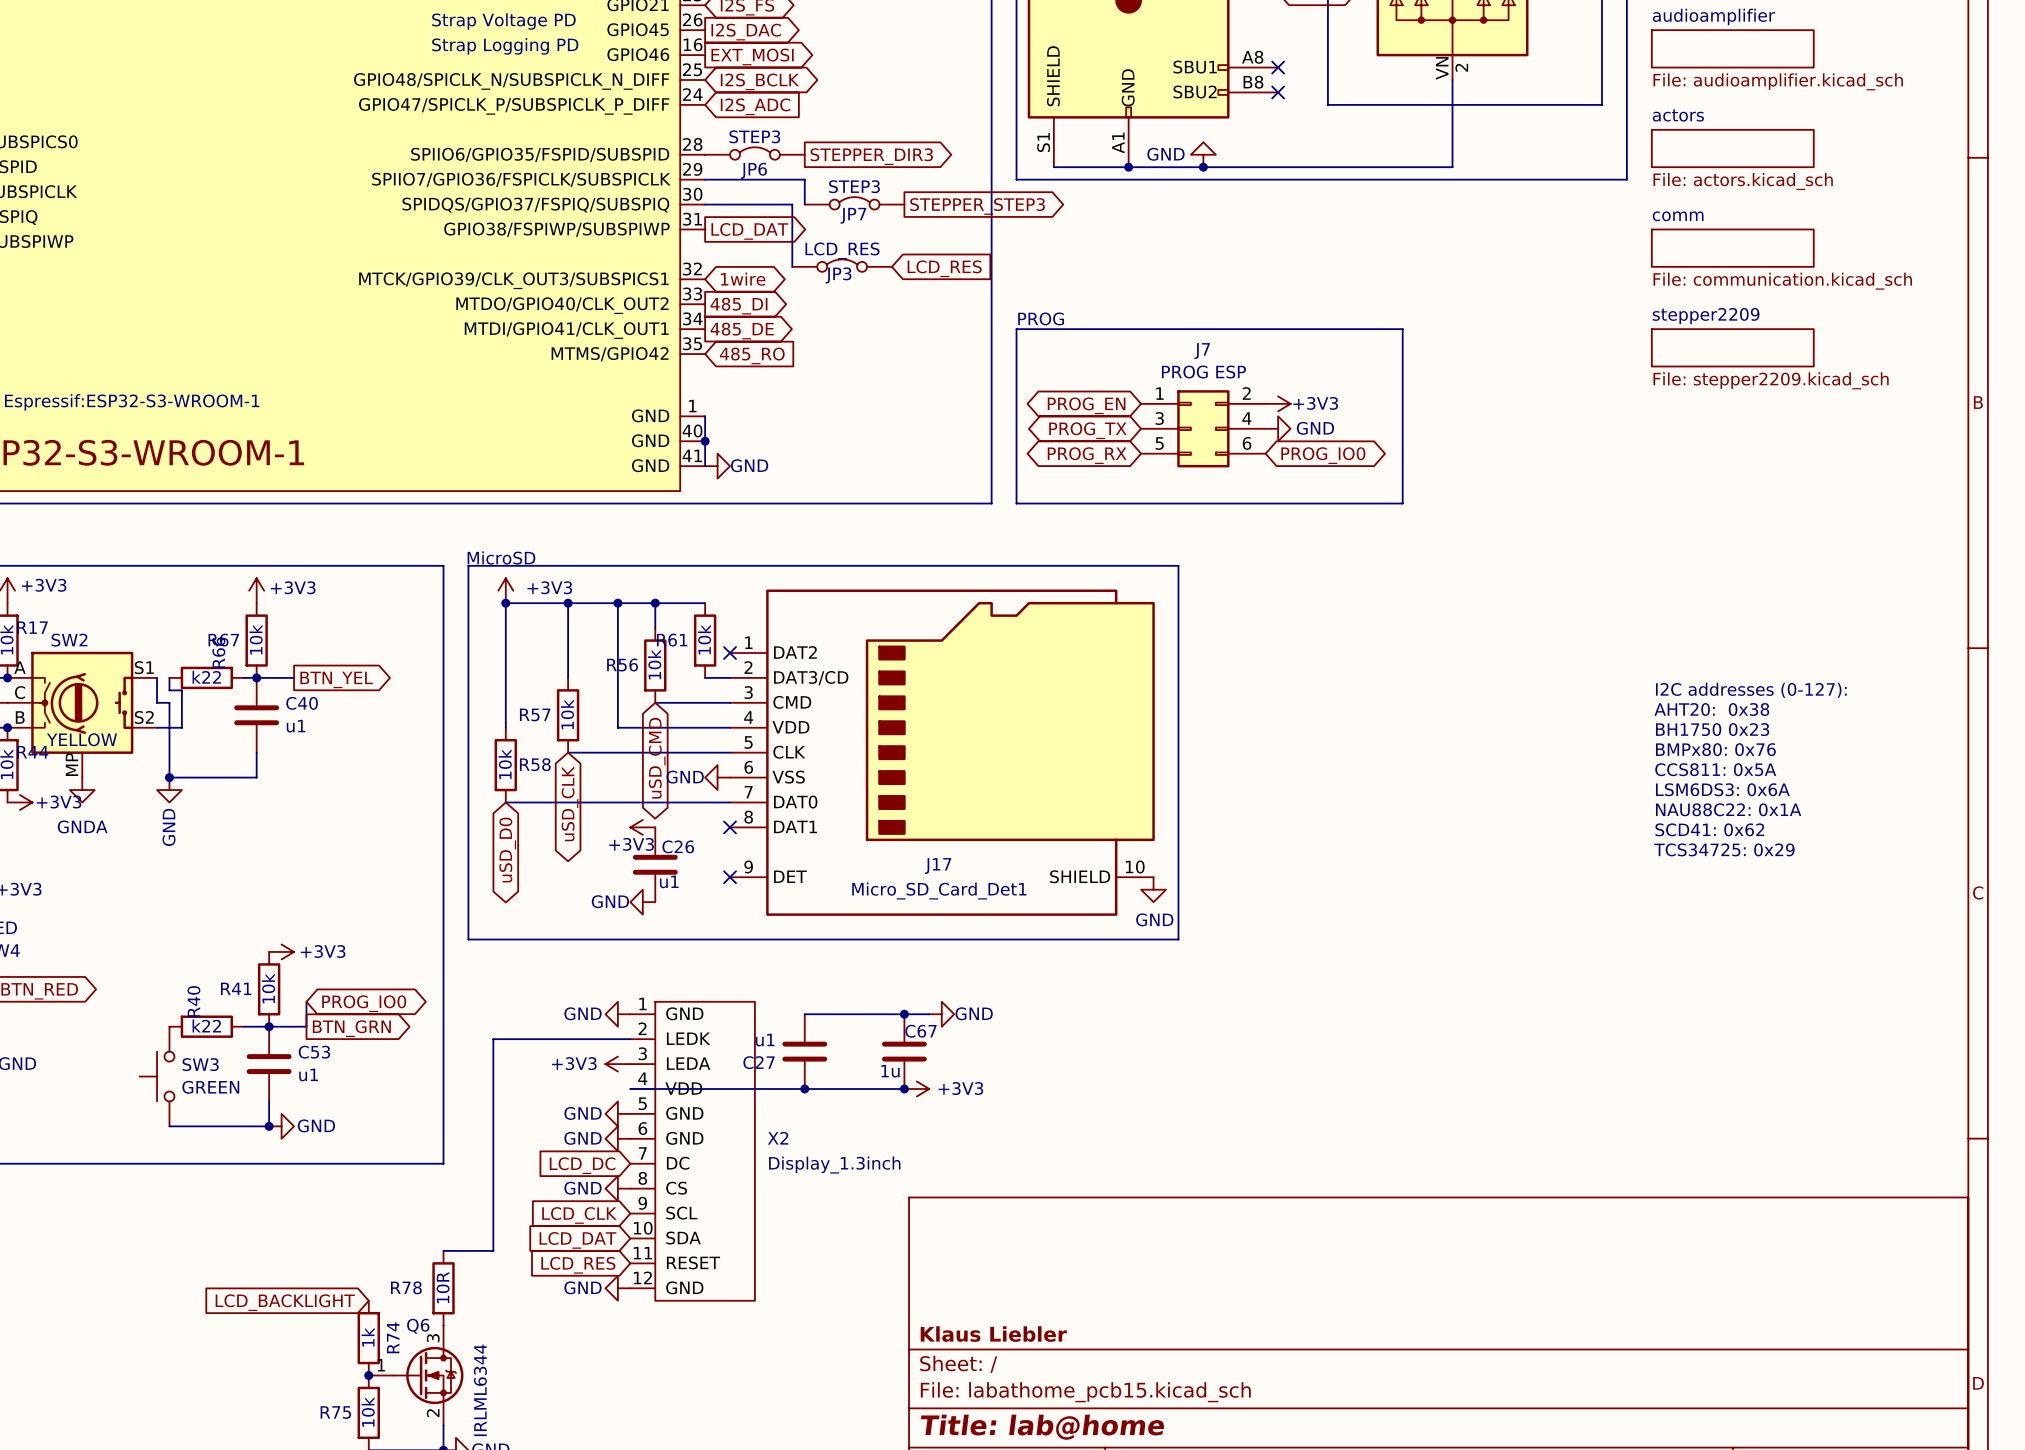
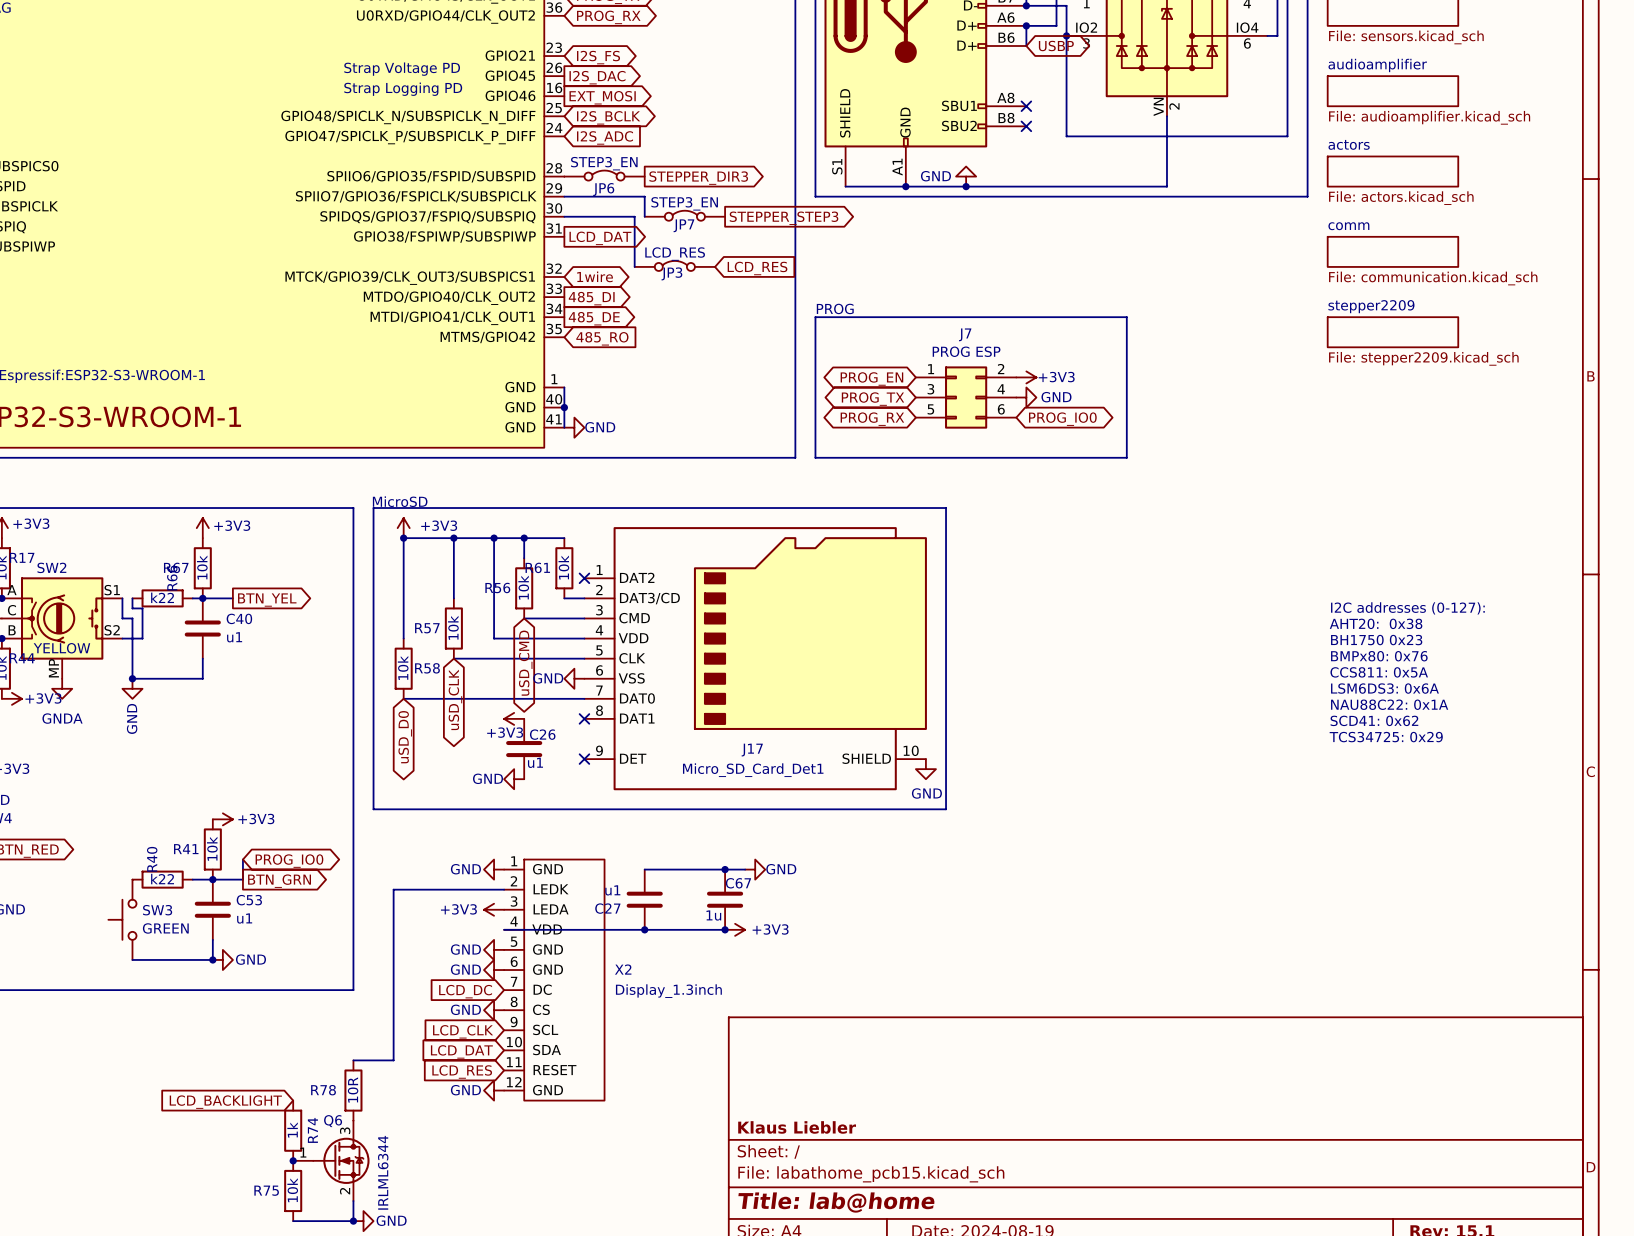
JP6 value: STEP3 (754, 136) -> STEP3_EN (604, 163)
JP7 value: STEP3 (854, 186) -> STEP3_EN (684, 203)

